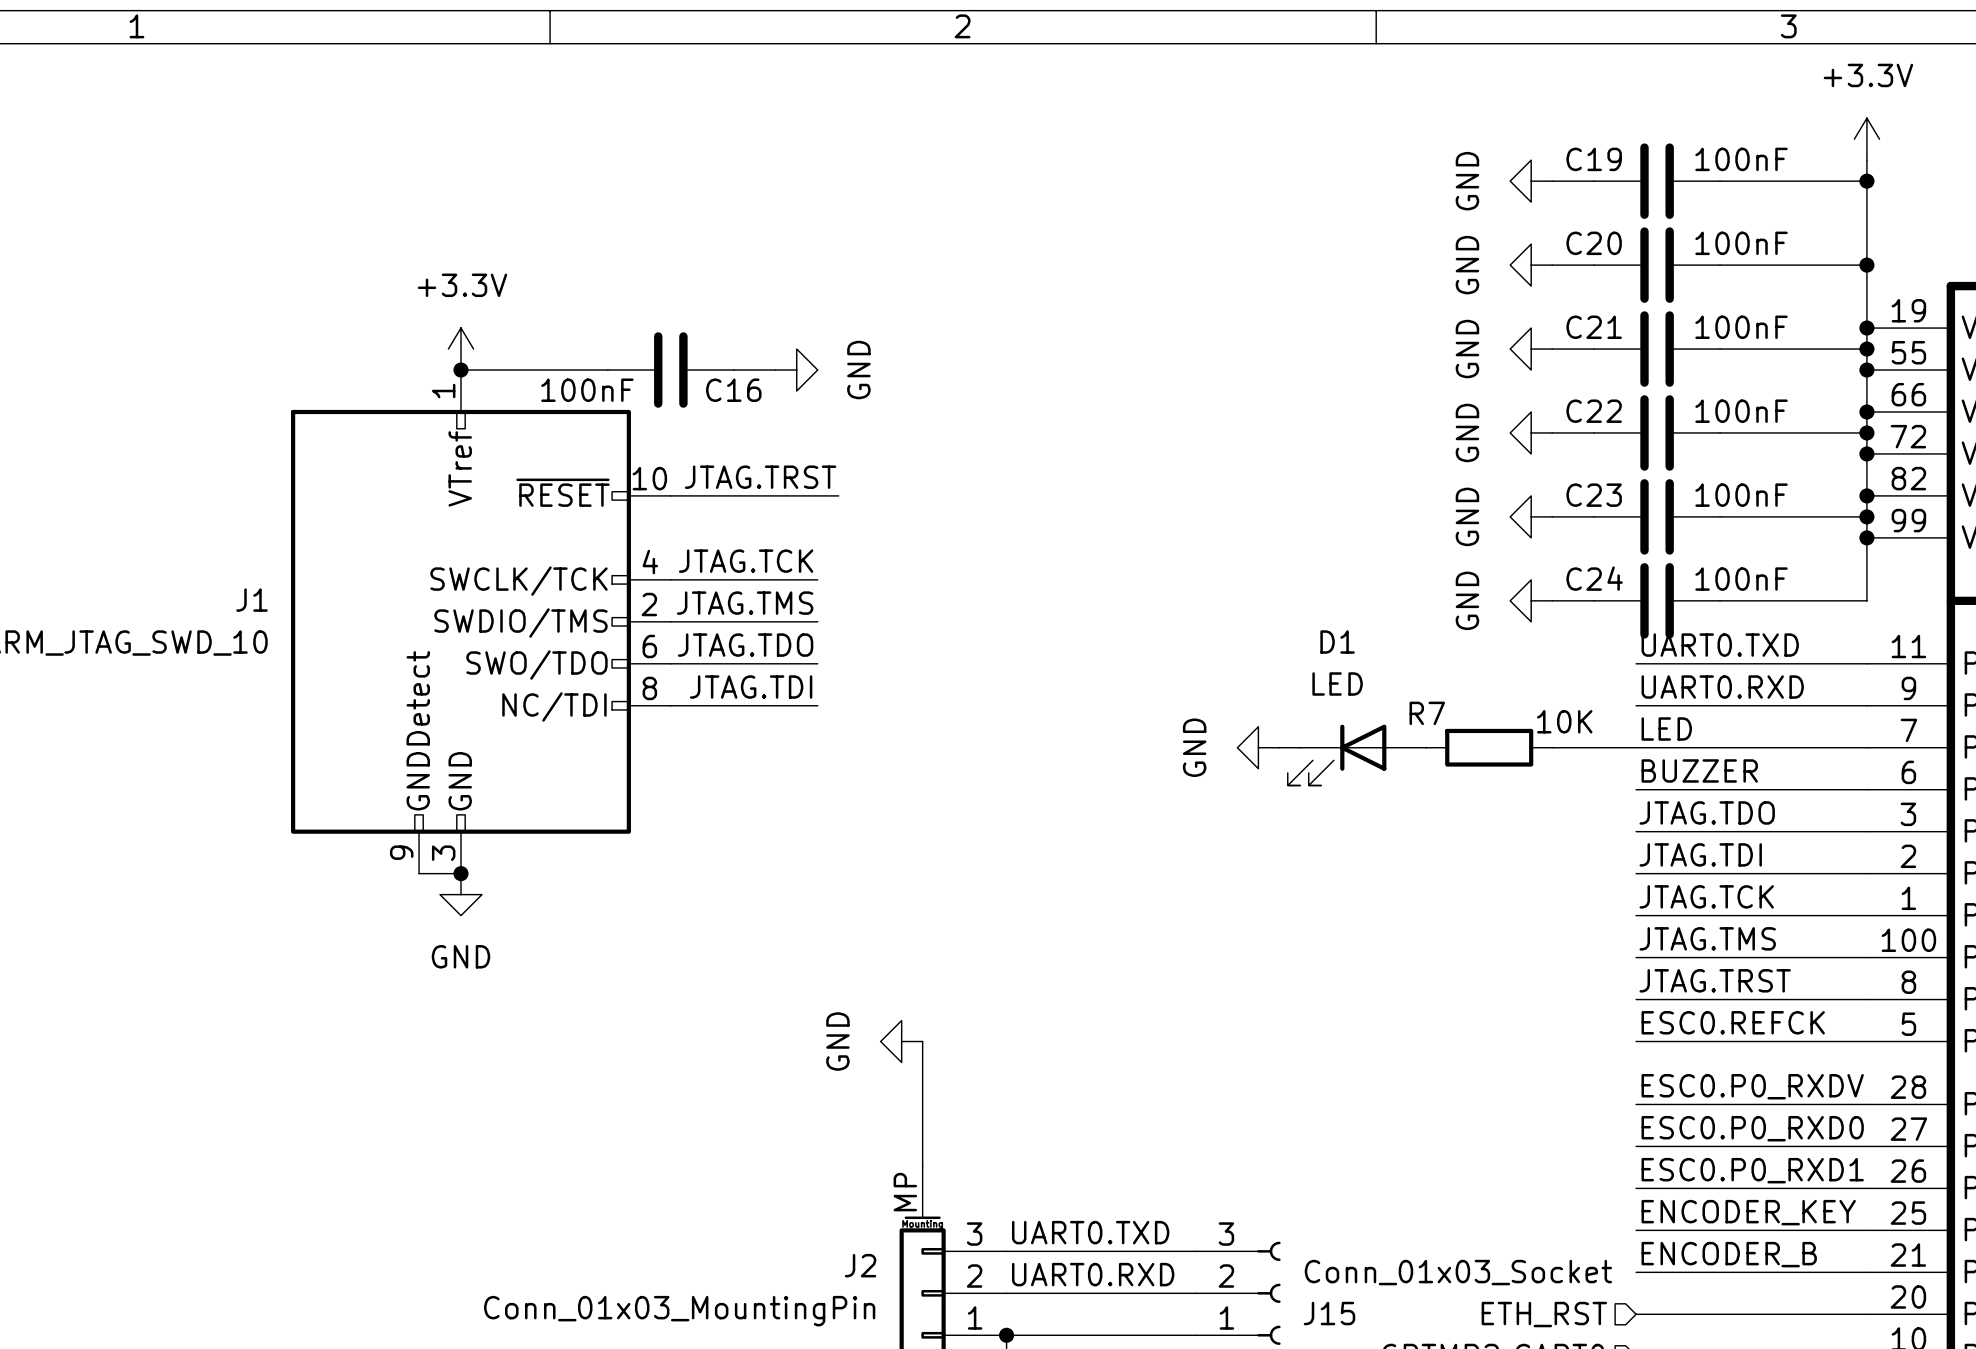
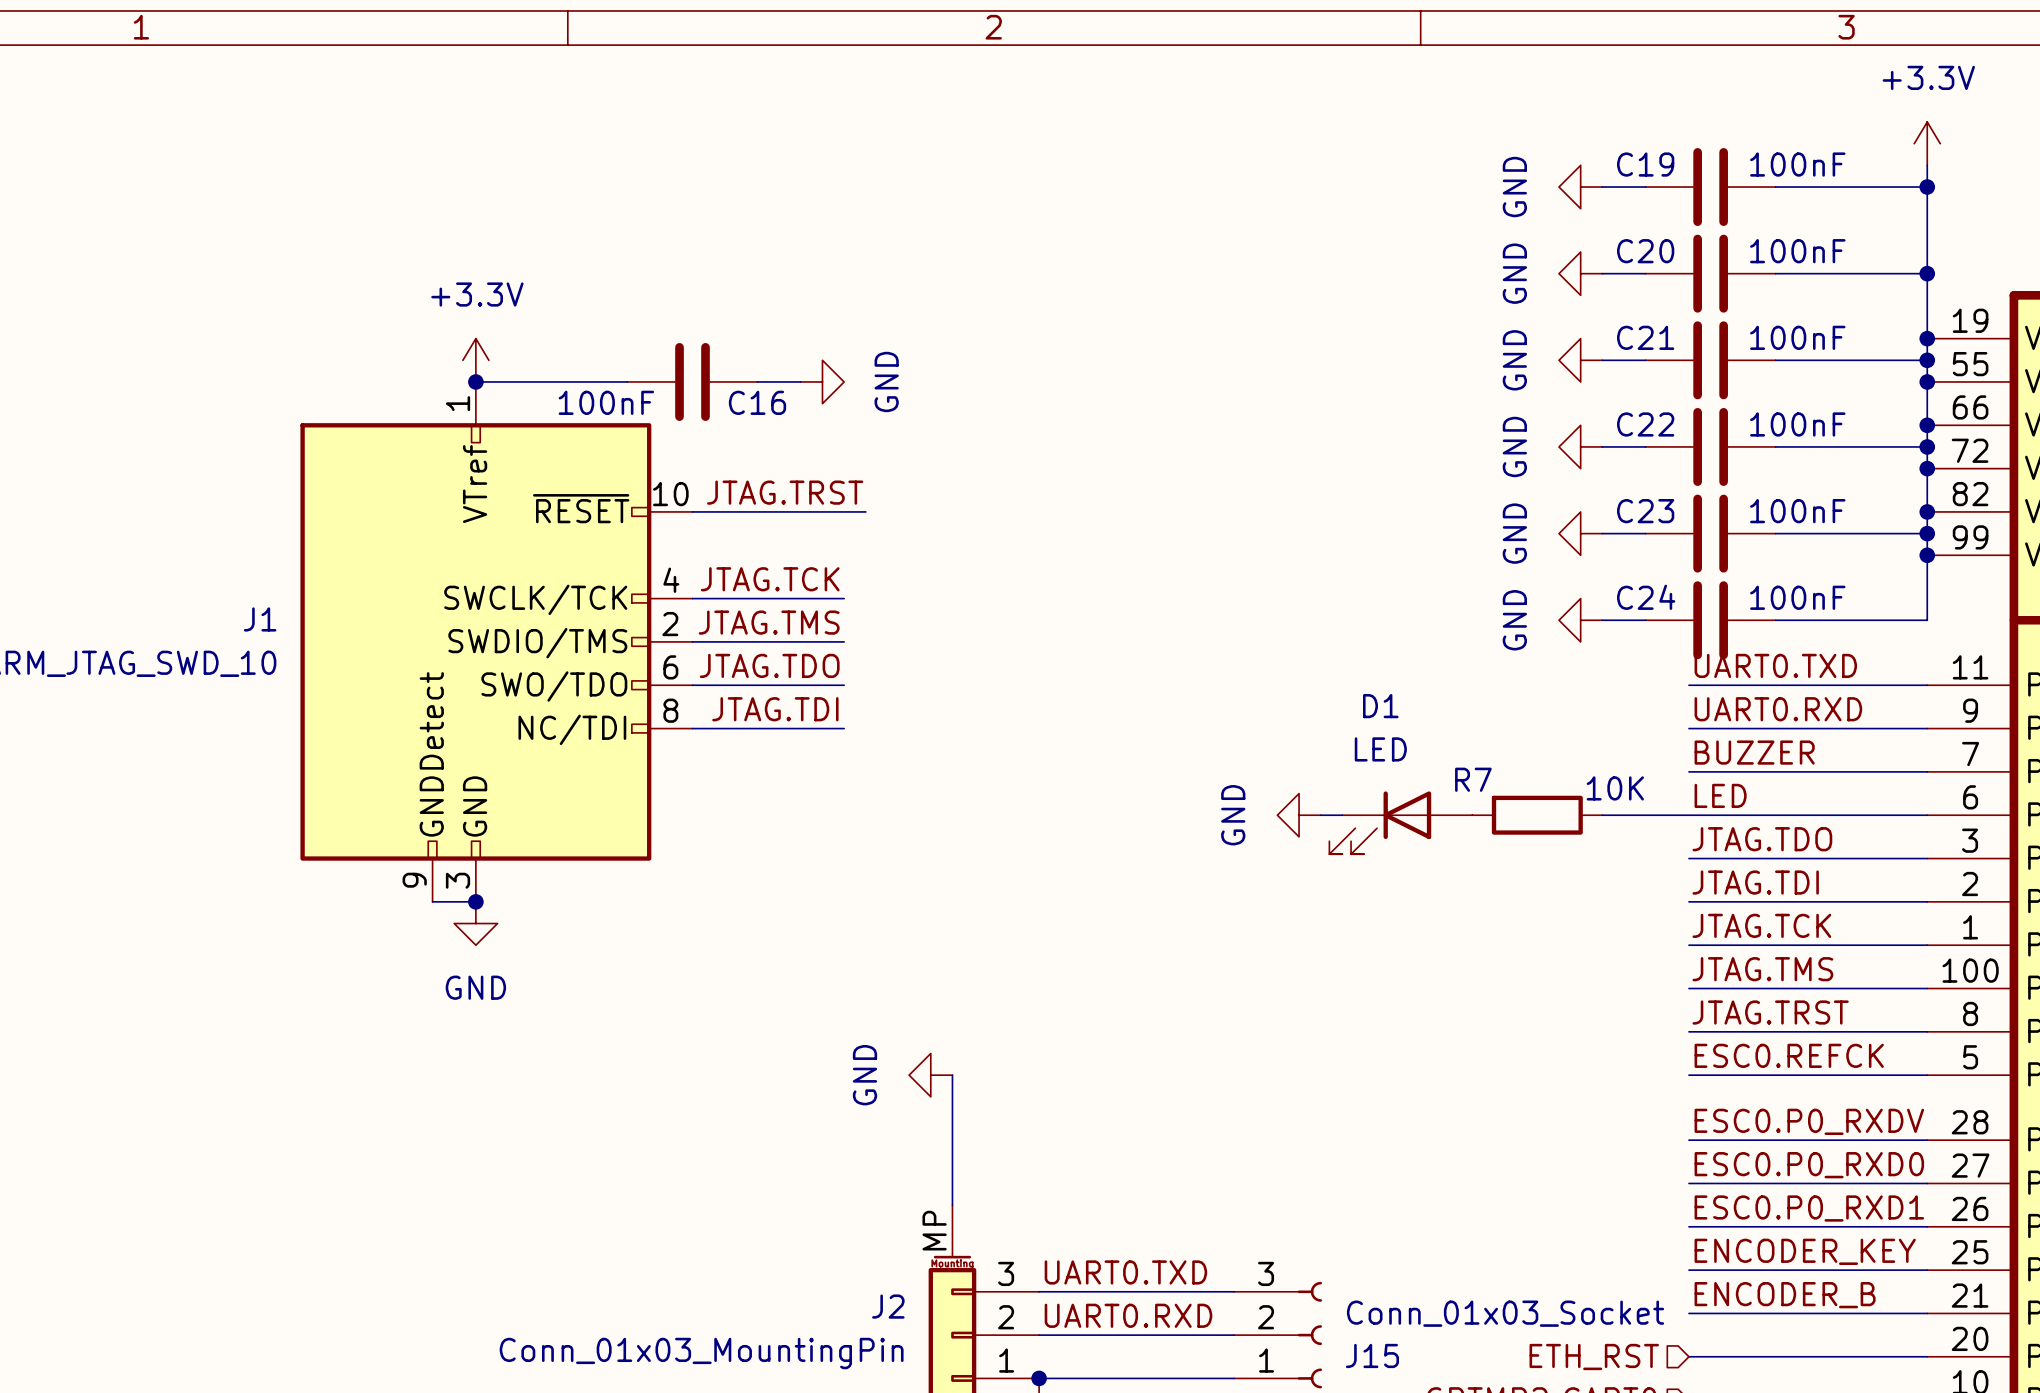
label: LED (1666, 729) -> BUZZER (1754, 752)
power symbol position: GND (1258, 747) -> GND (1299, 815)
wire: (1279, 747) (1300, 747) -> (1320, 815) (1342, 815)
R7 position: (1489, 747) -> (1537, 815)
wire: (1552, 747) (1636, 747) -> (1602, 815) (1688, 815)
D1 position: (1357, 755) -> (1400, 822)
label: BUZZER (1699, 770) -> LED (1720, 795)

